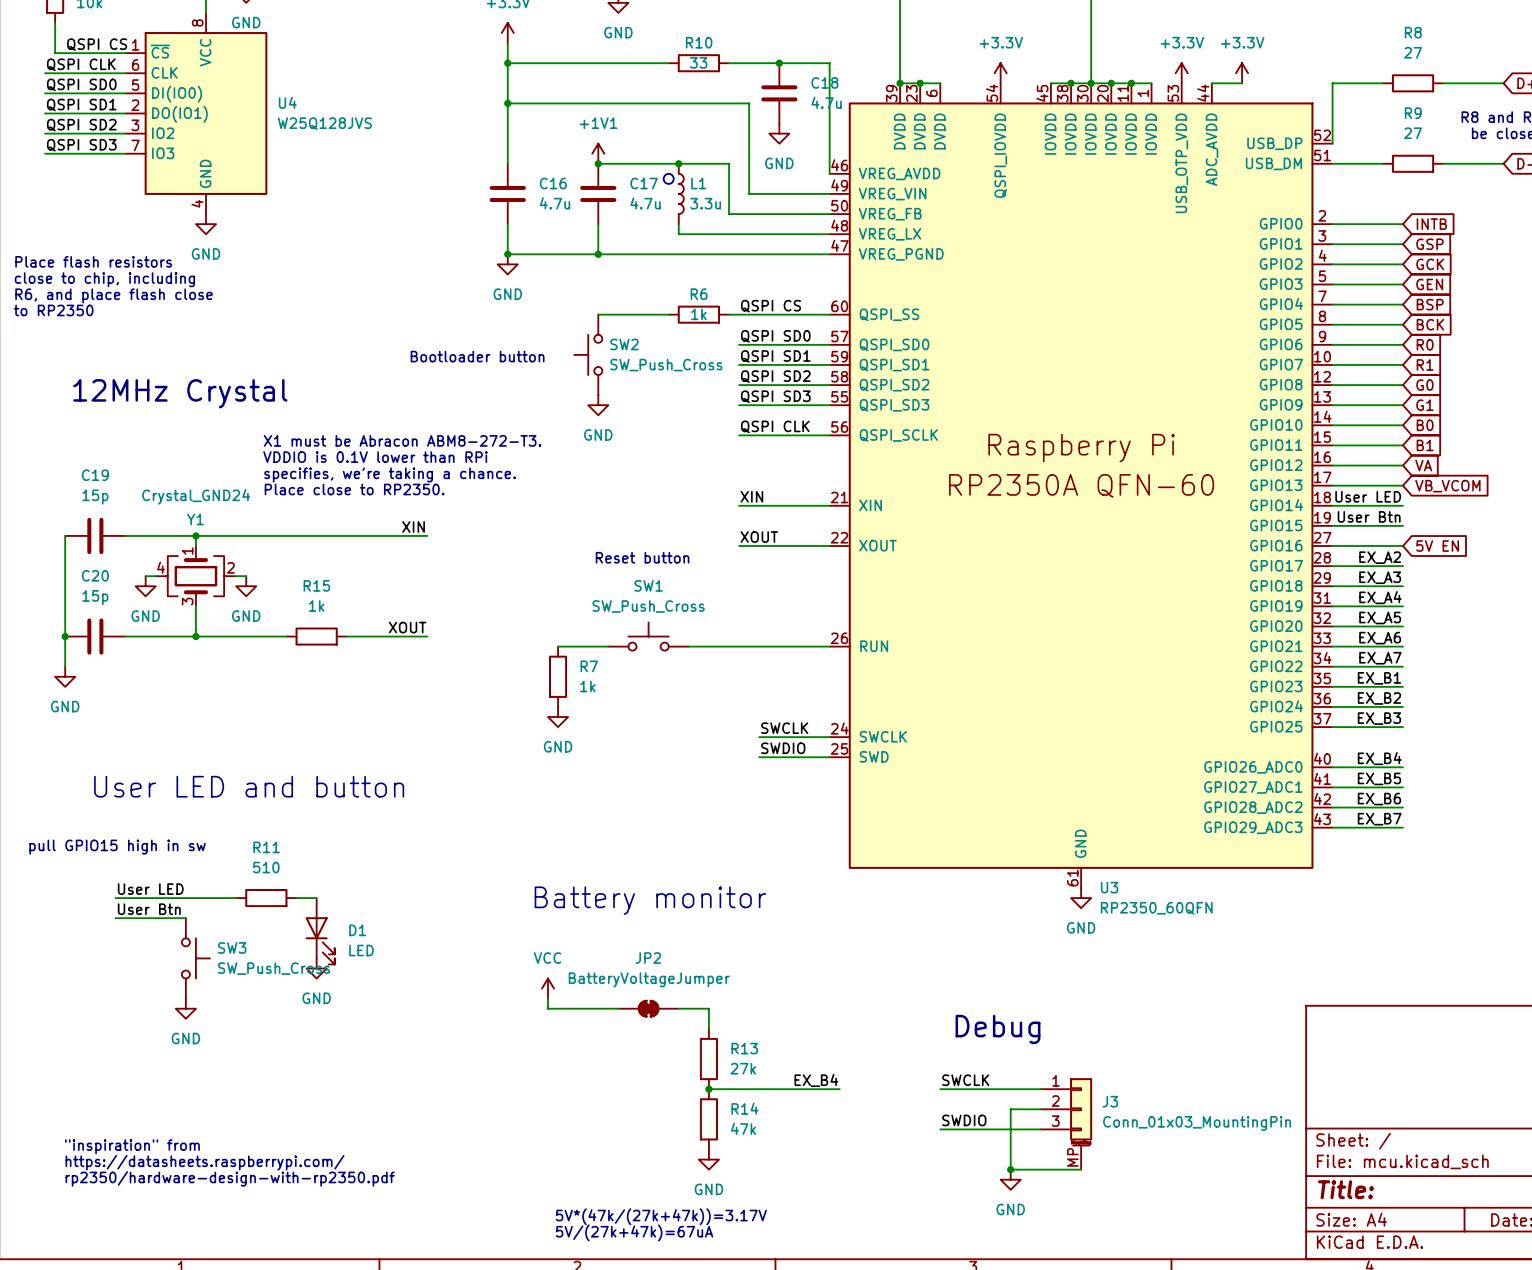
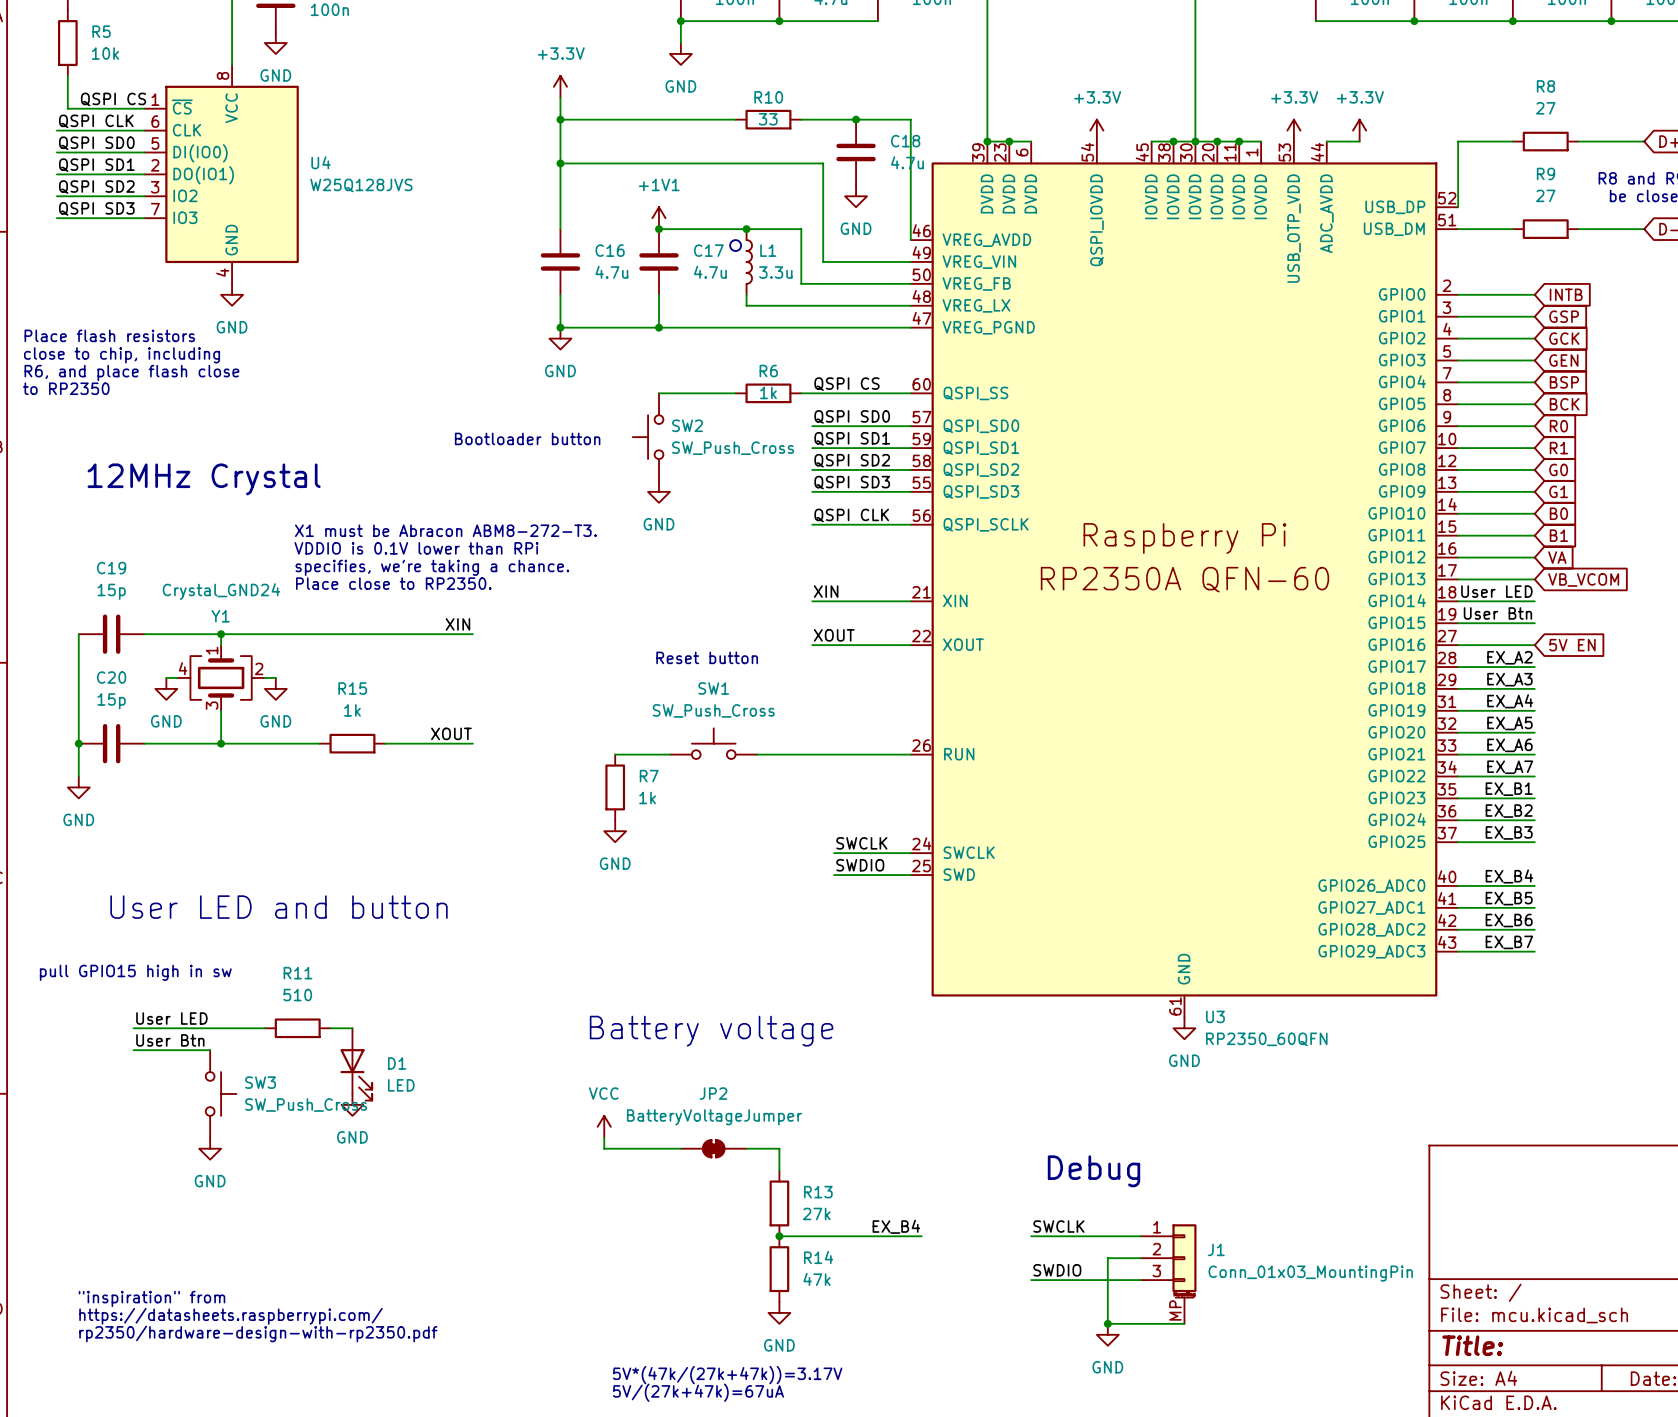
text: Battery monitor (650, 900) -> Battery voltage (711, 1031)
J3 name: J3 (1110, 1101) -> J1 (1216, 1249)

